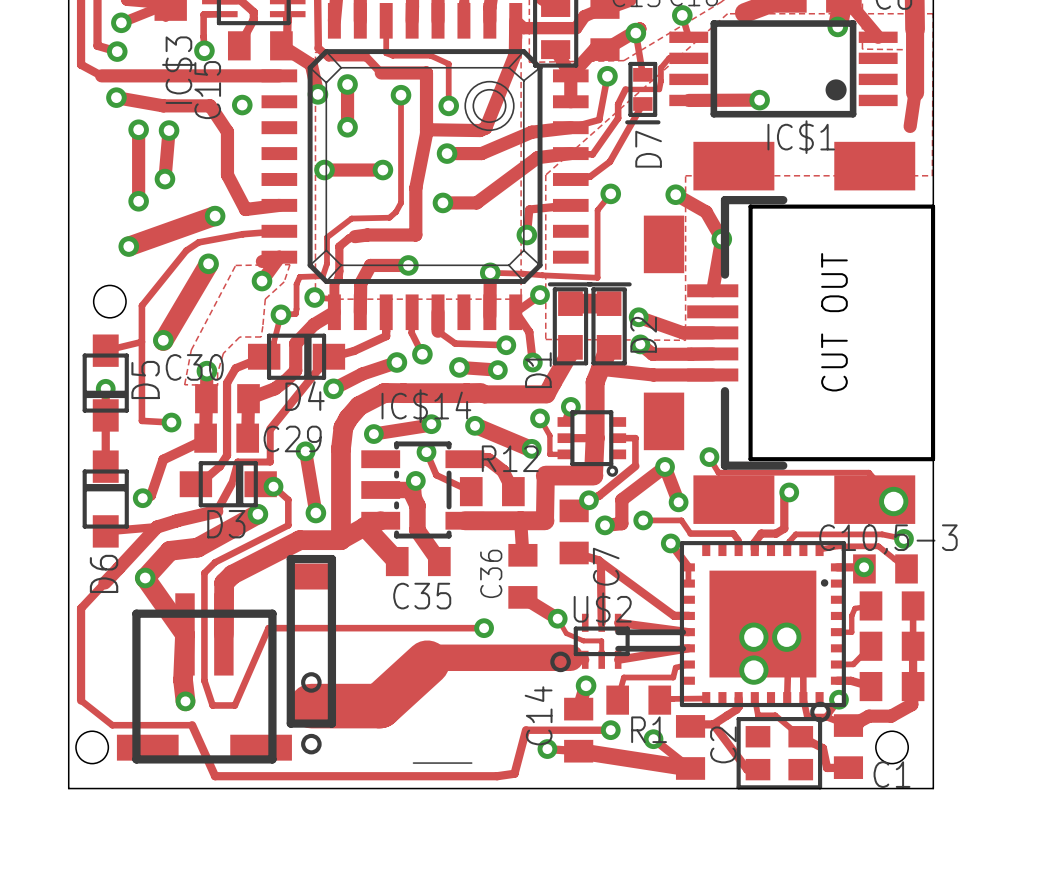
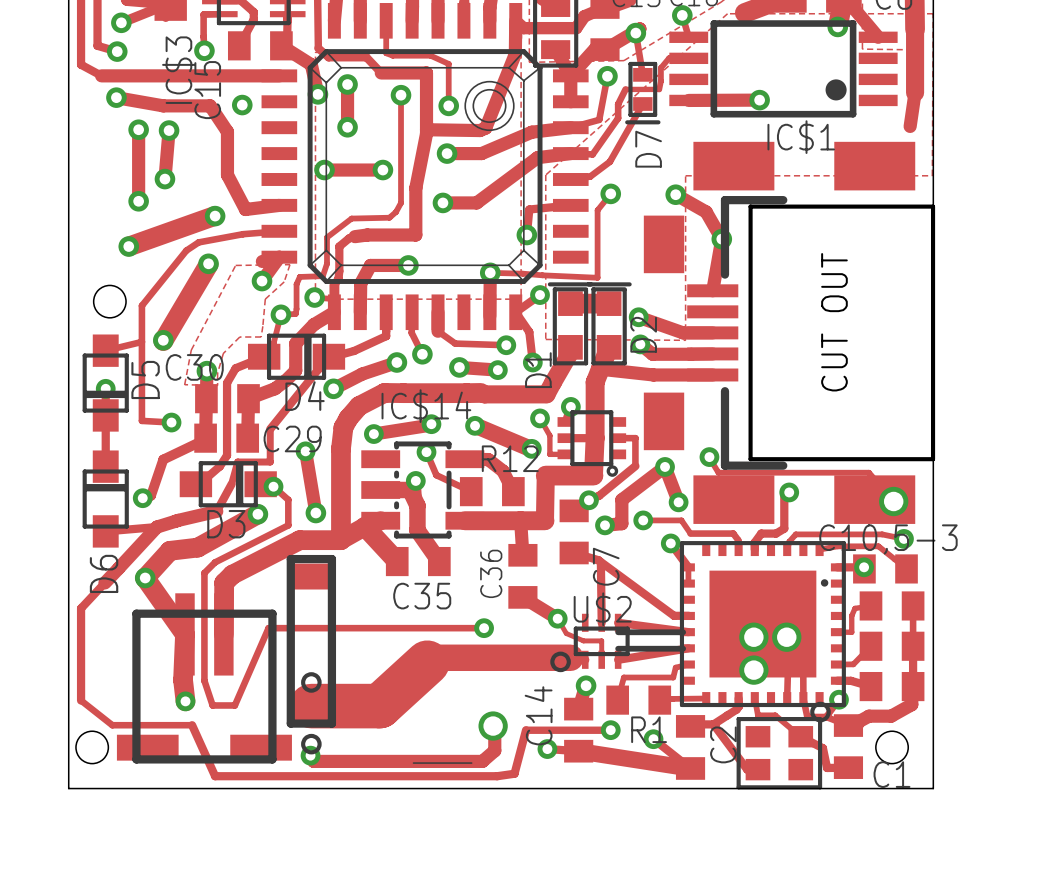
track: none -> (493, 726) (494, 726) (494, 750) (482, 761) (313, 761) (310, 755)
via: none -> (493, 726)
via: none -> (310, 755)

